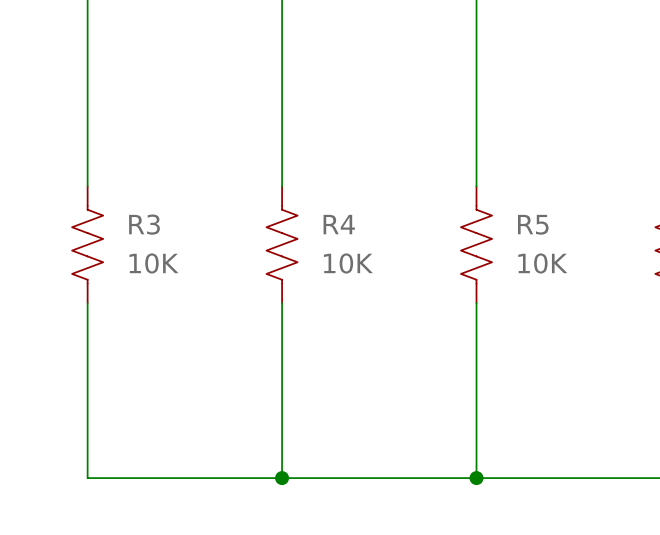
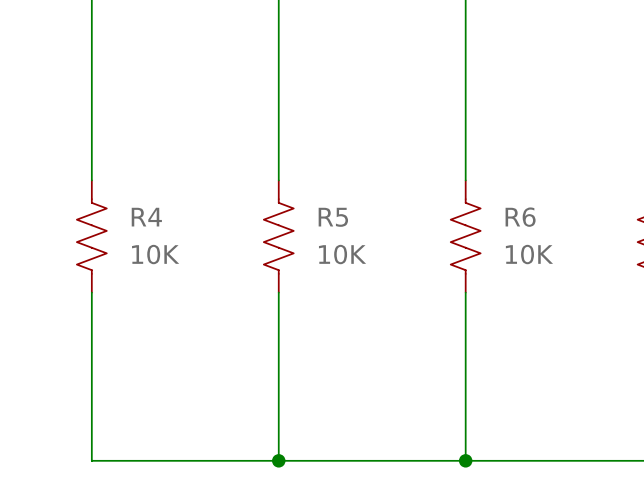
R3 name: R3 (144, 224) -> R4 (146, 217)
R4 name: R4 (339, 224) -> R5 (333, 217)
R5 name: R5 (533, 224) -> R6 (520, 217)

